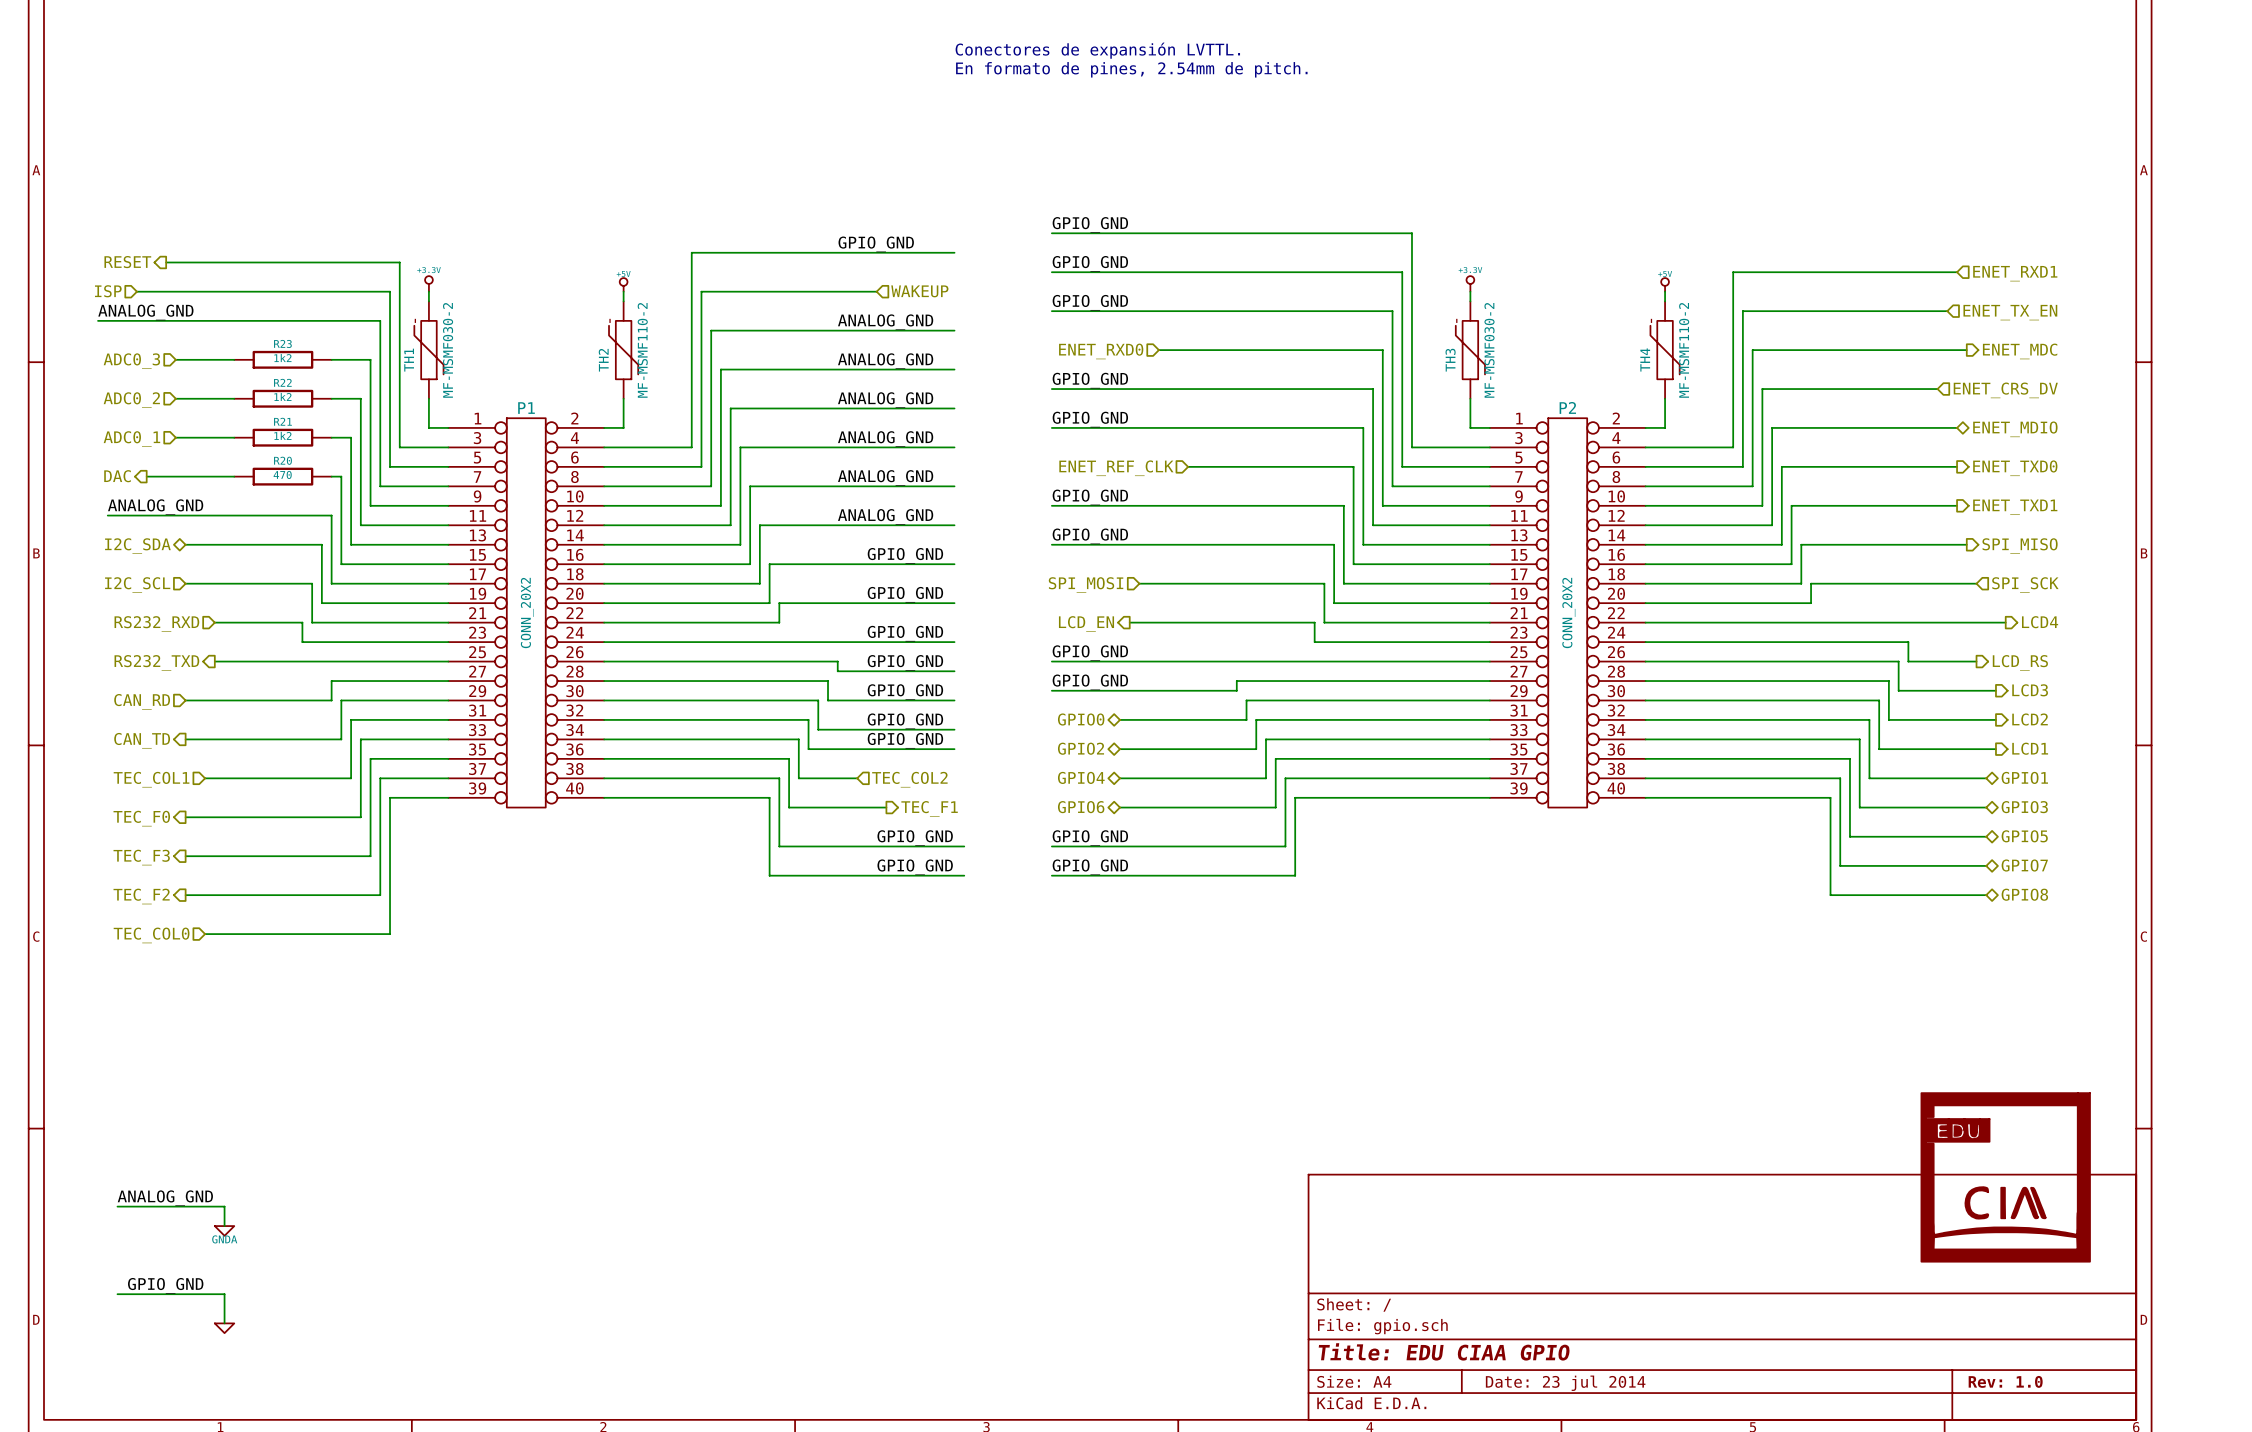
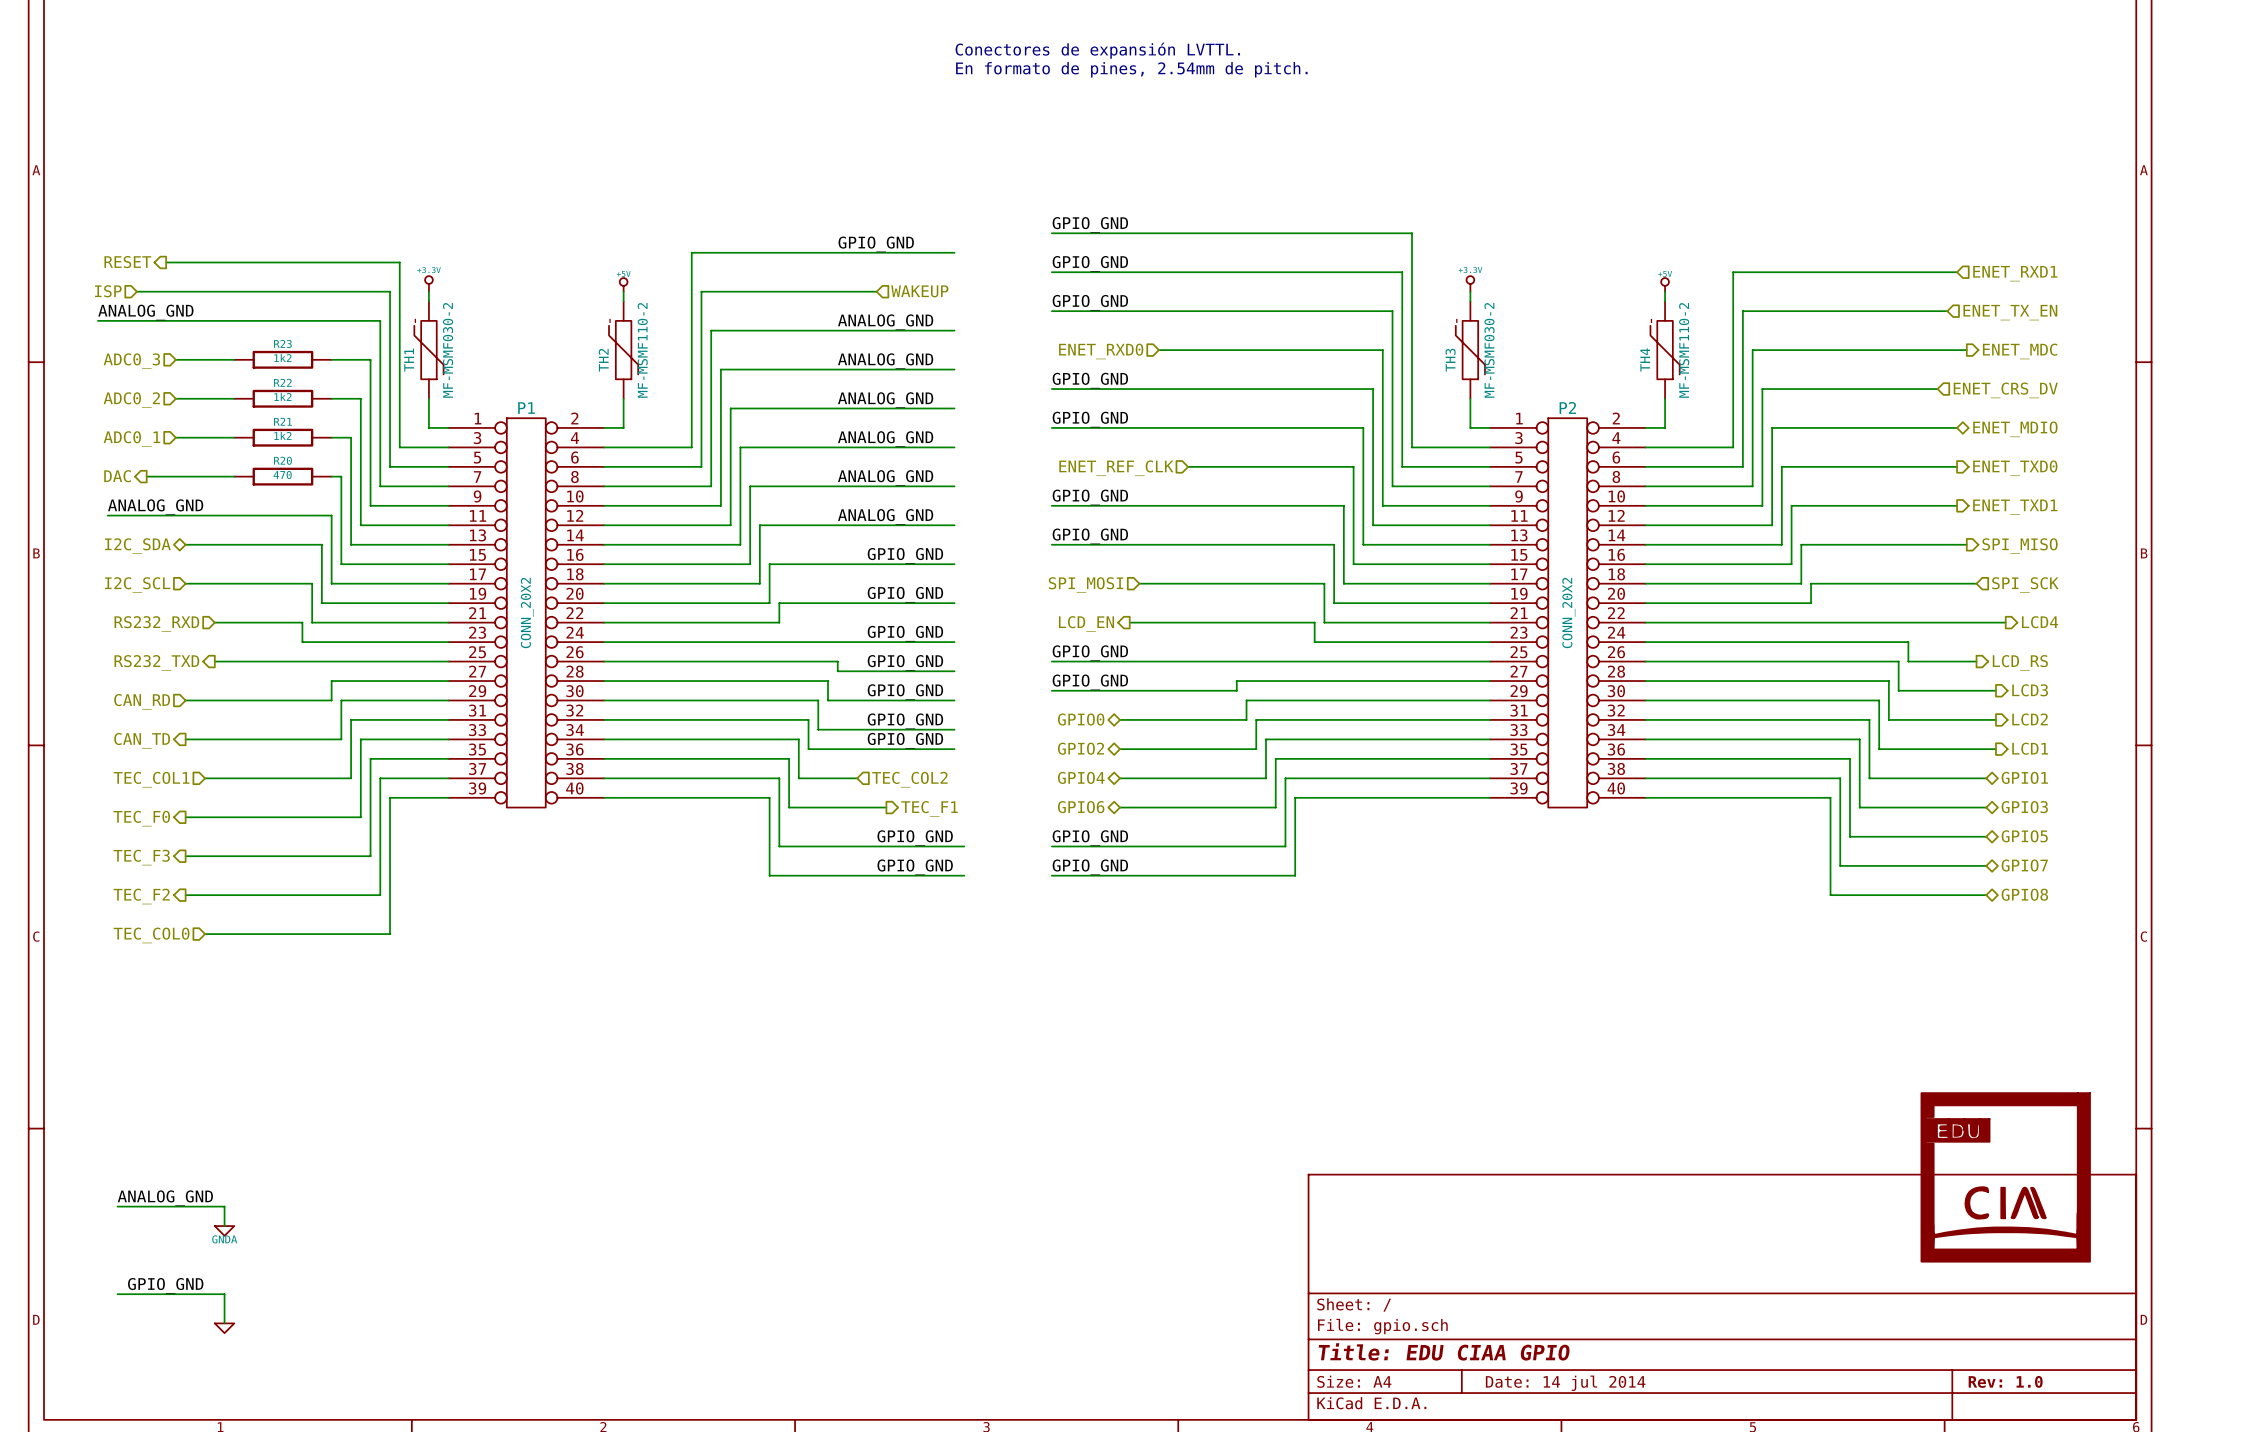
title block: Date: 23 jul 2014 (1565, 1383) -> Date: 14 jul 2014 (1565, 1383)

